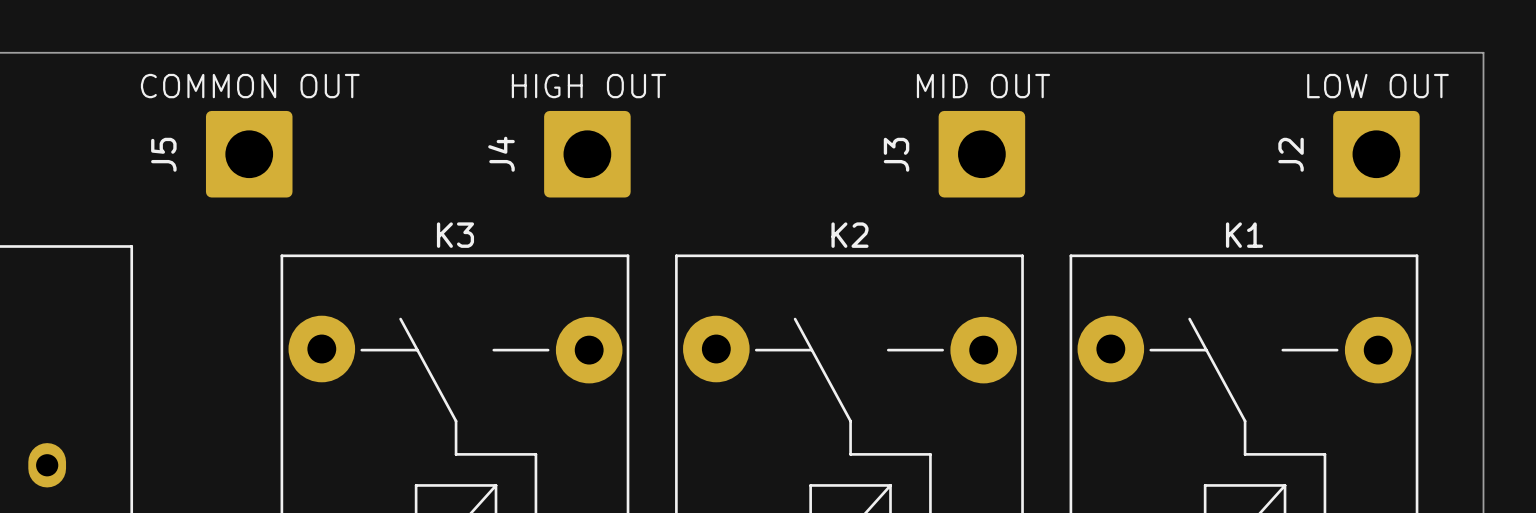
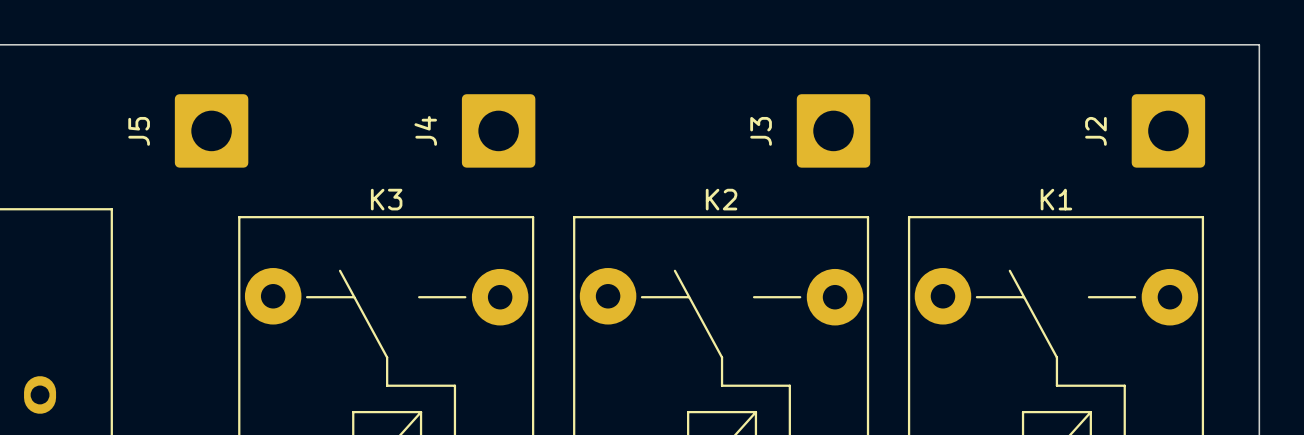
text: COMMON OUT (250, 86) -> none
text: HIGH OUT (588, 86) -> none
text: MID OUT (983, 86) -> none
text: LOW OUT (1377, 86) -> none

